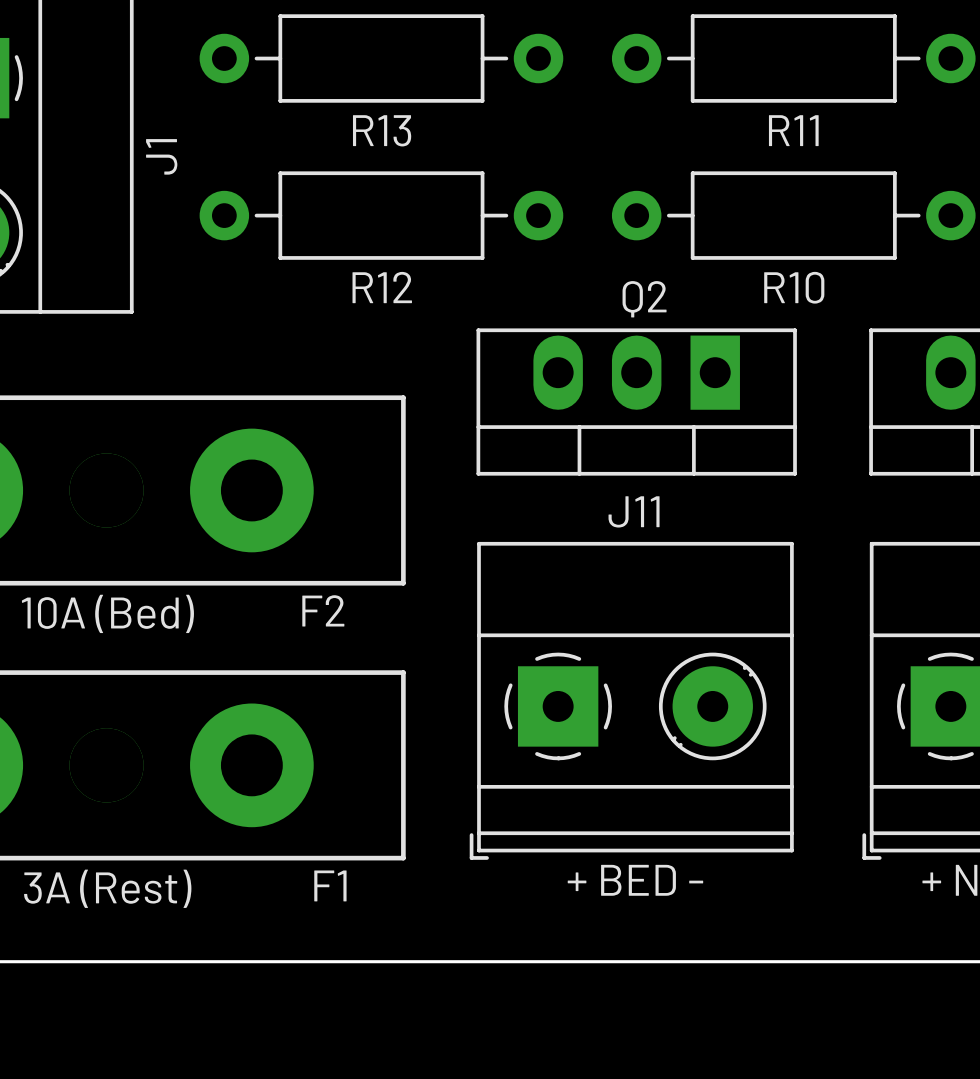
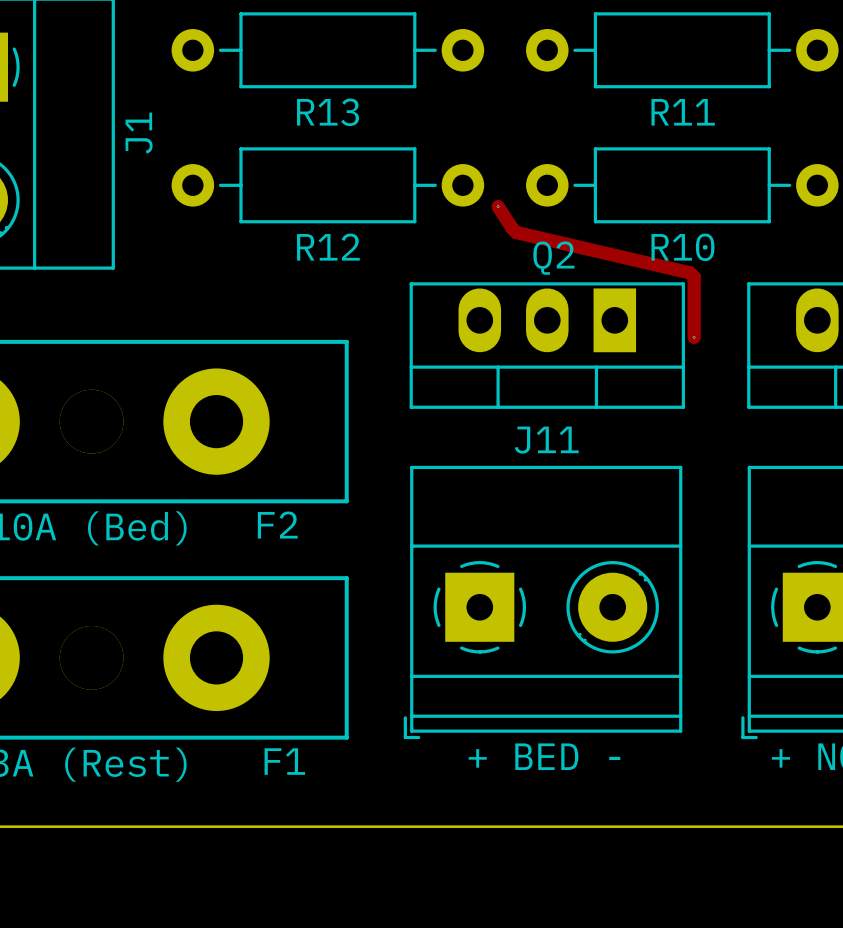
track: none -> (498, 206) (516, 232) (689, 272) (694, 277) (694, 337)
via: none -> (498, 206)
via: none -> (694, 337)

